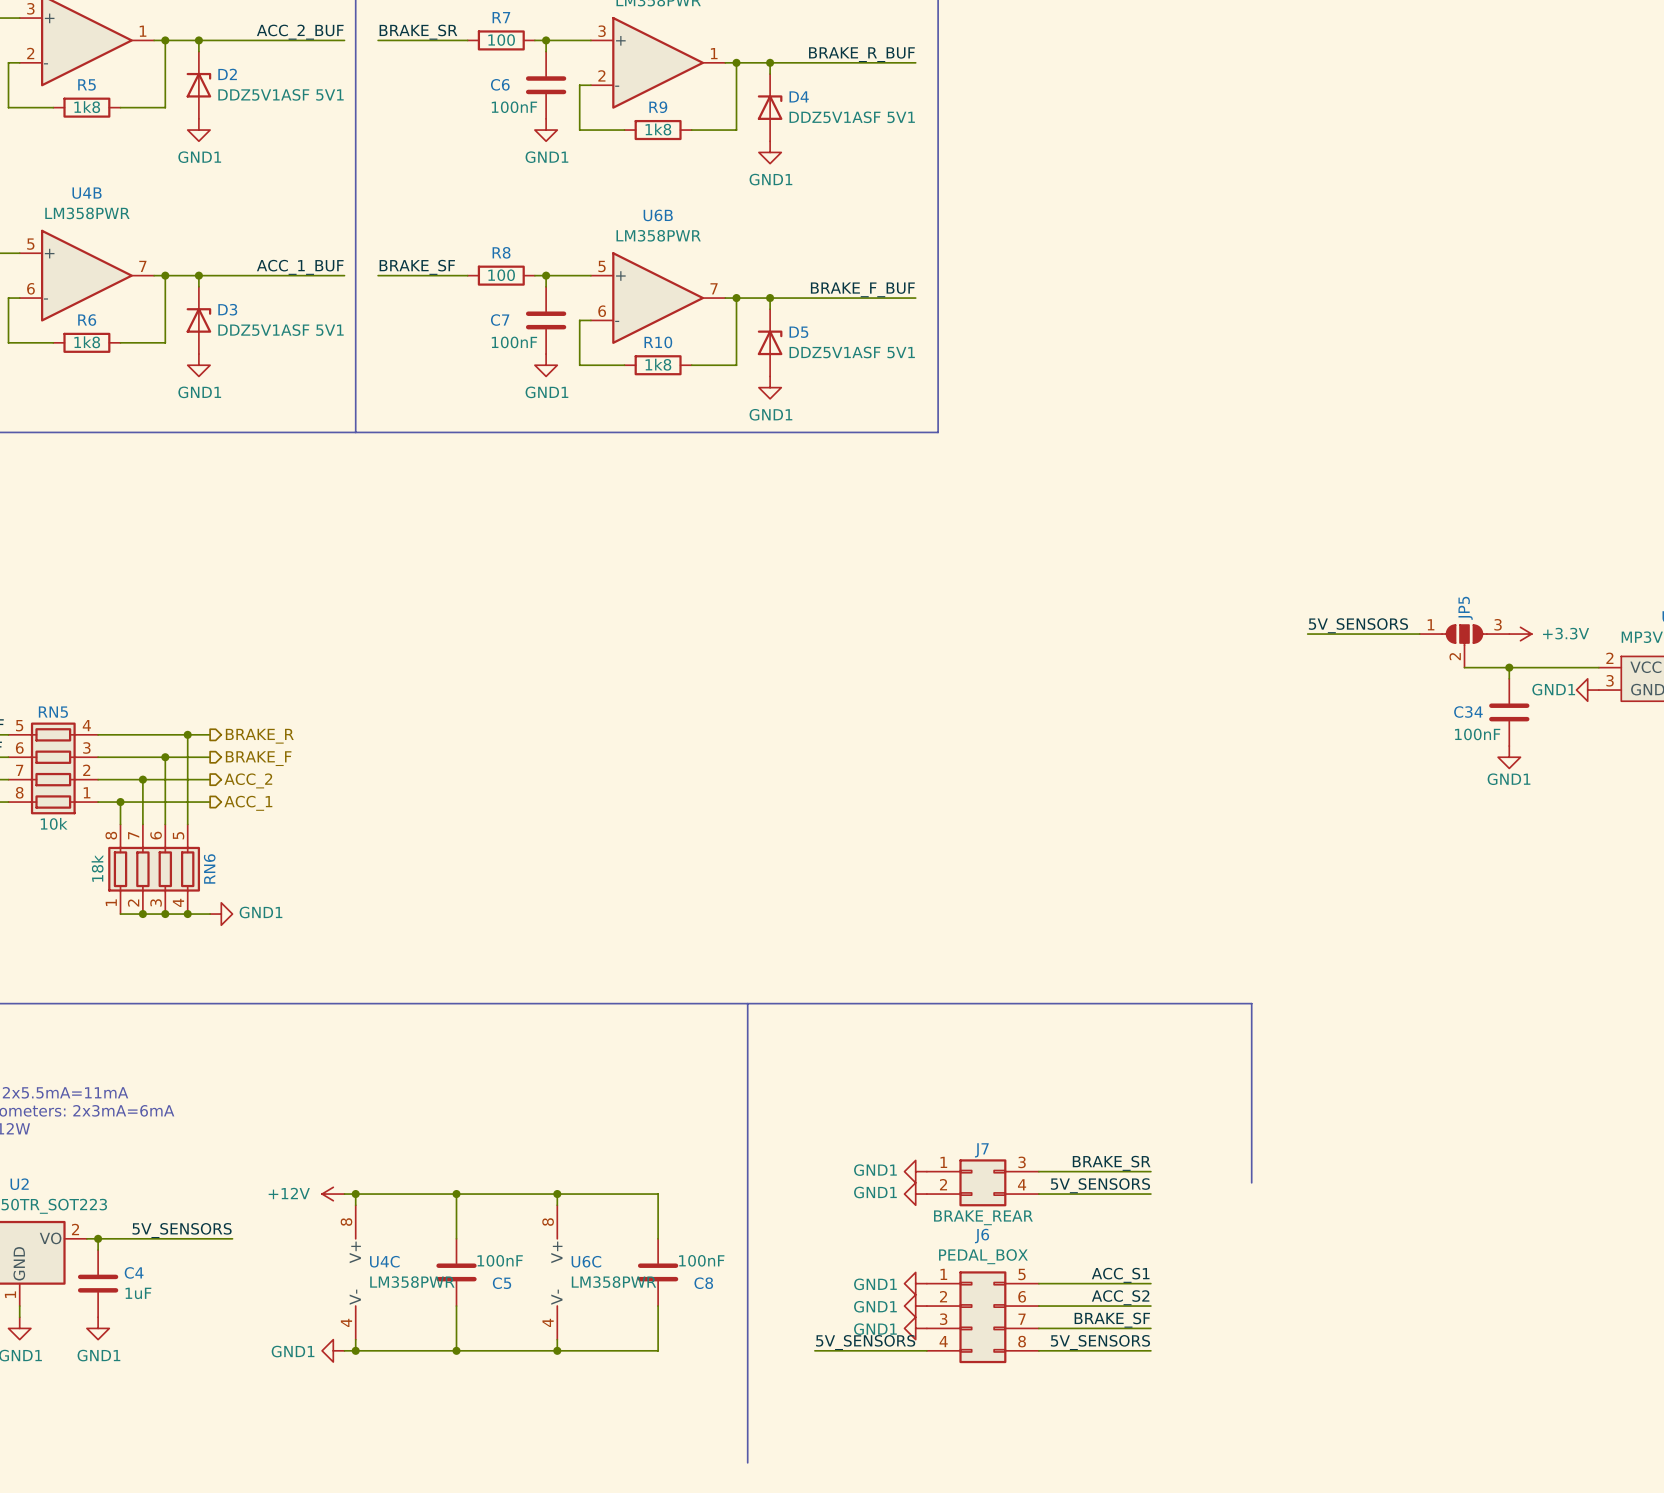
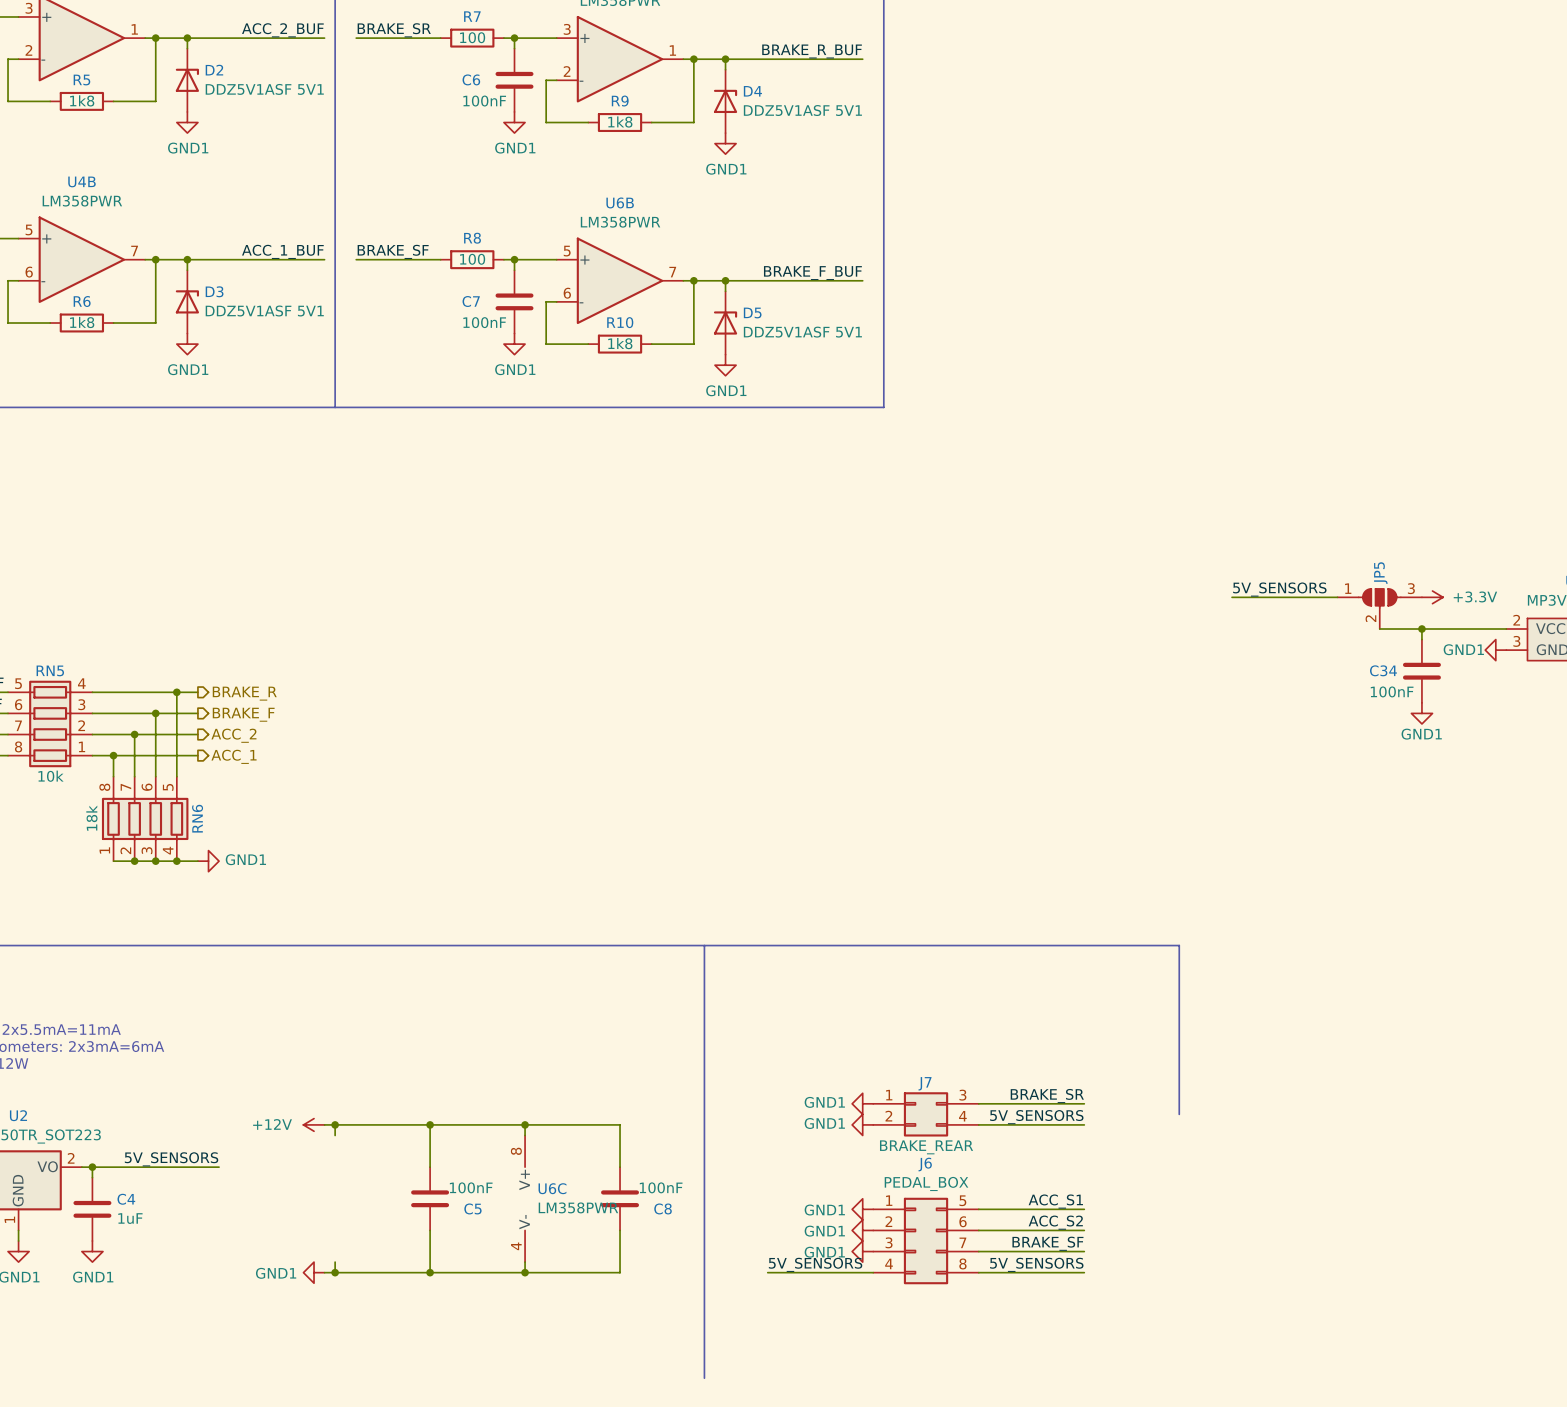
U4C: LM358PWR (355, 1272) -> none

